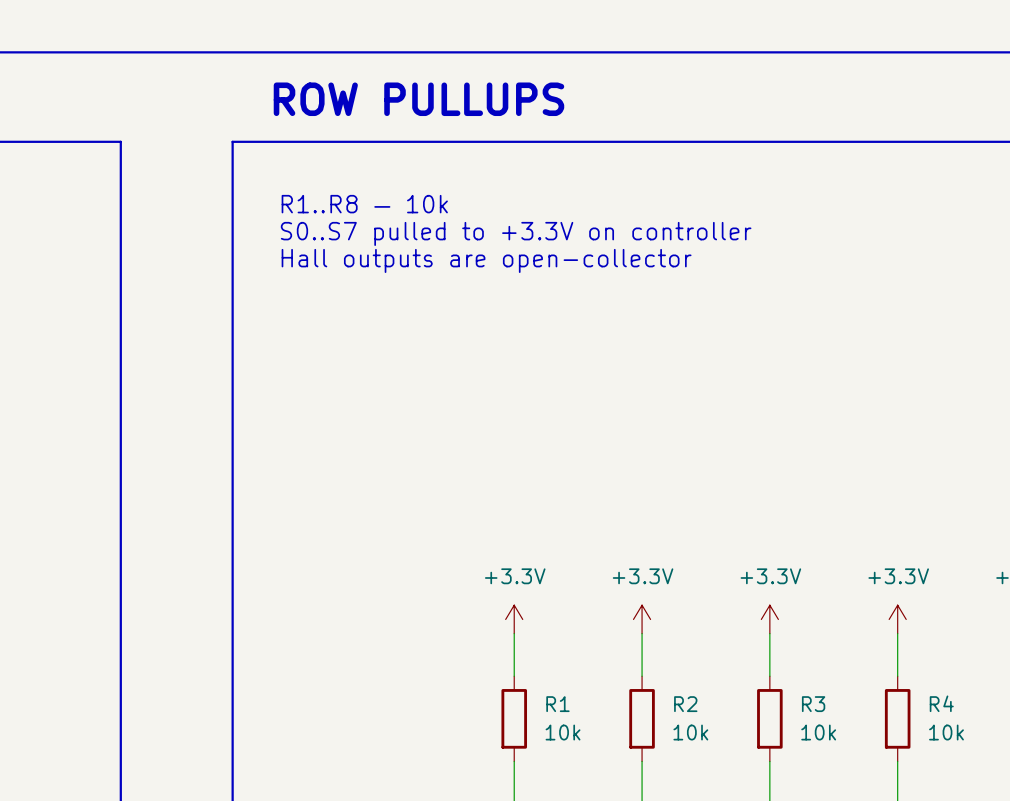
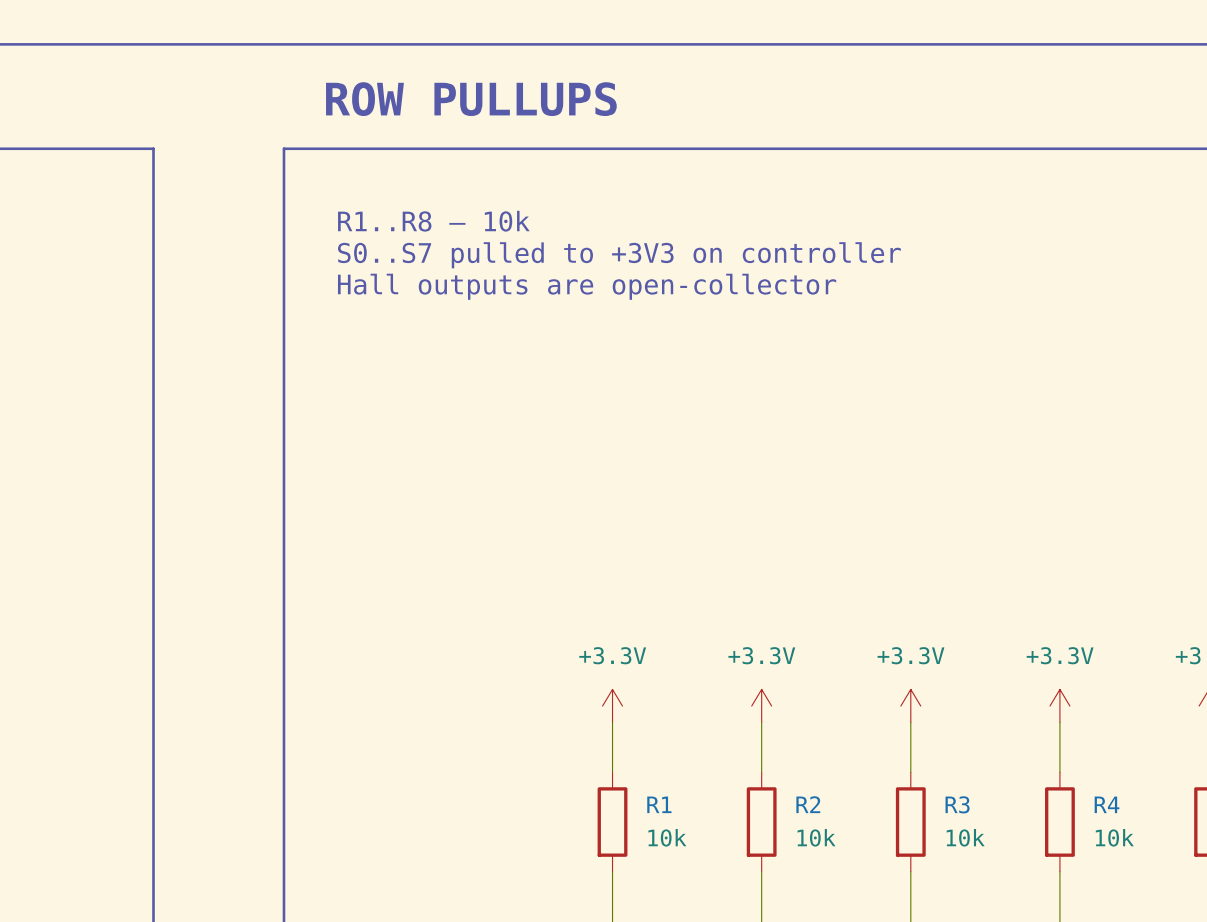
text: S0..S7 pulled to +3.3V on controller (516, 233) -> S0..S7 pulled to +3V3 on controller (619, 255)

